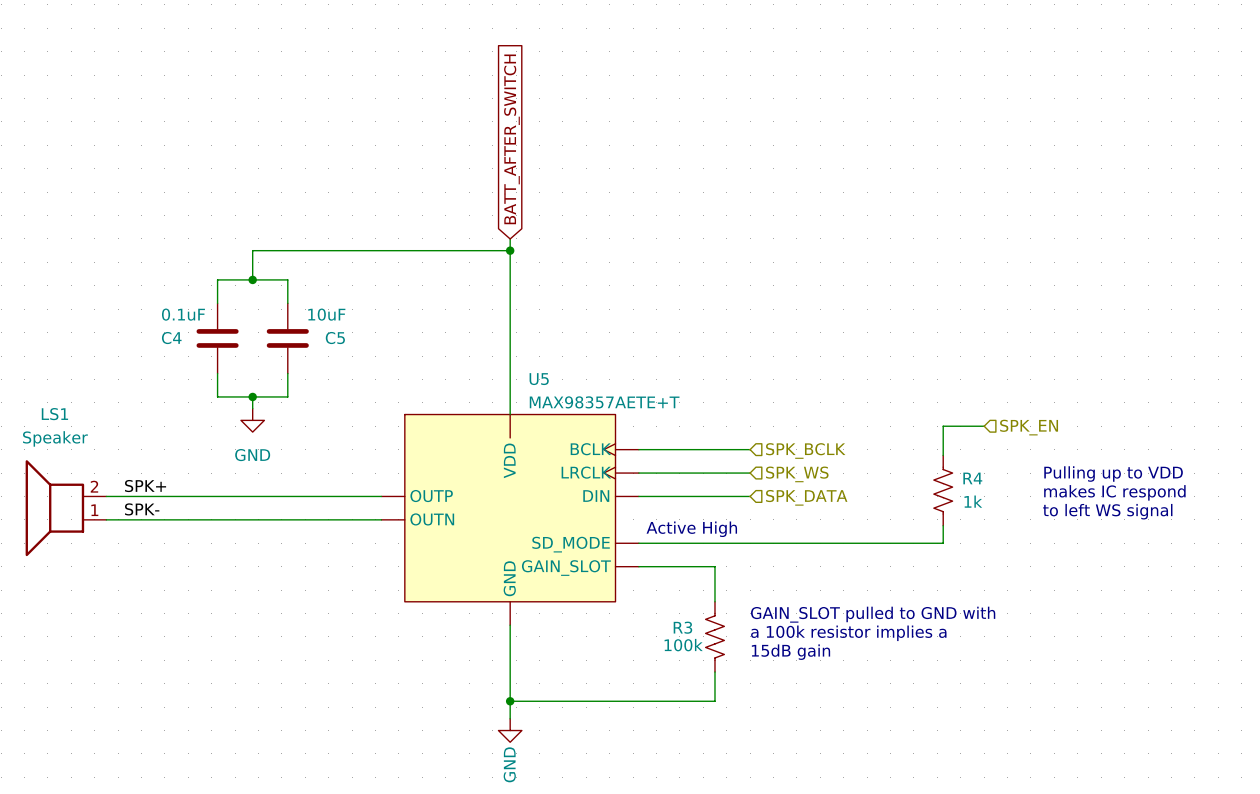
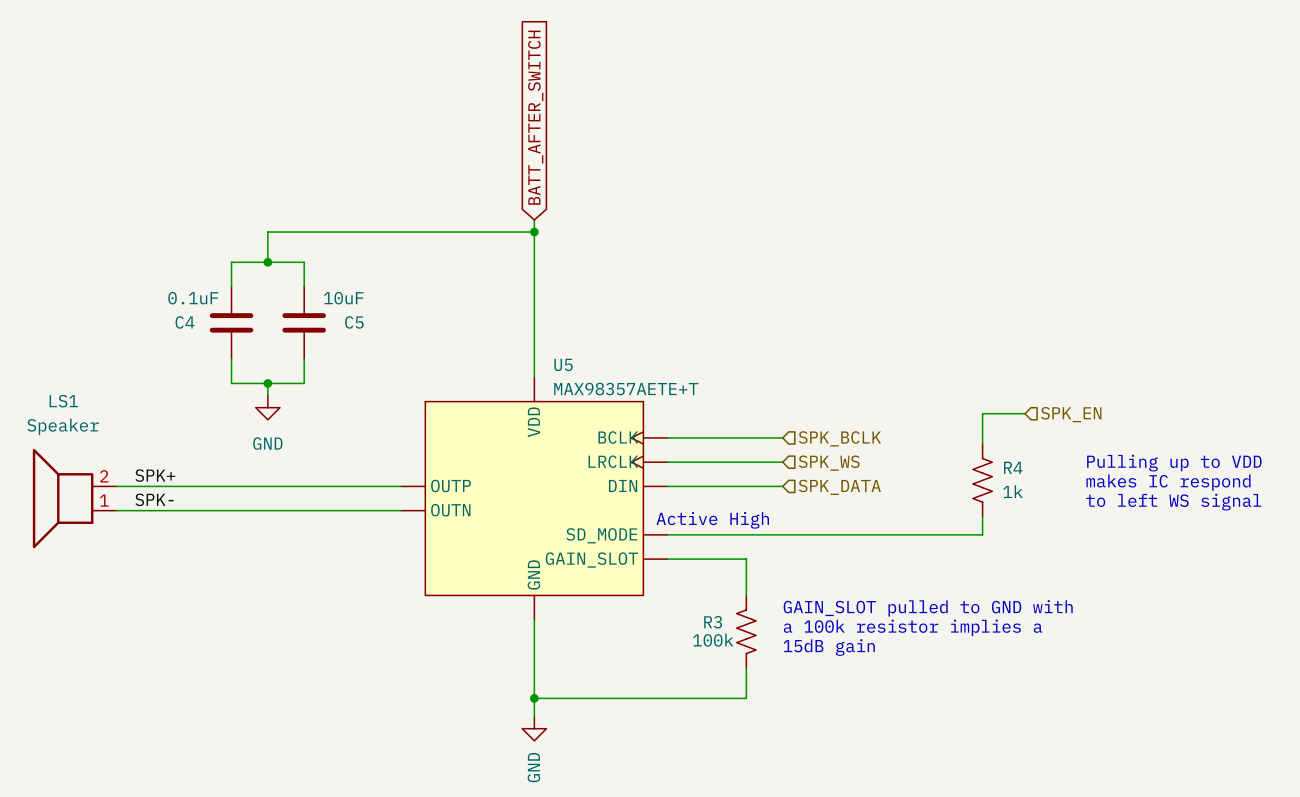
U5 symbol: [381, 414, 639, 626] -> [401, 377, 668, 620]

